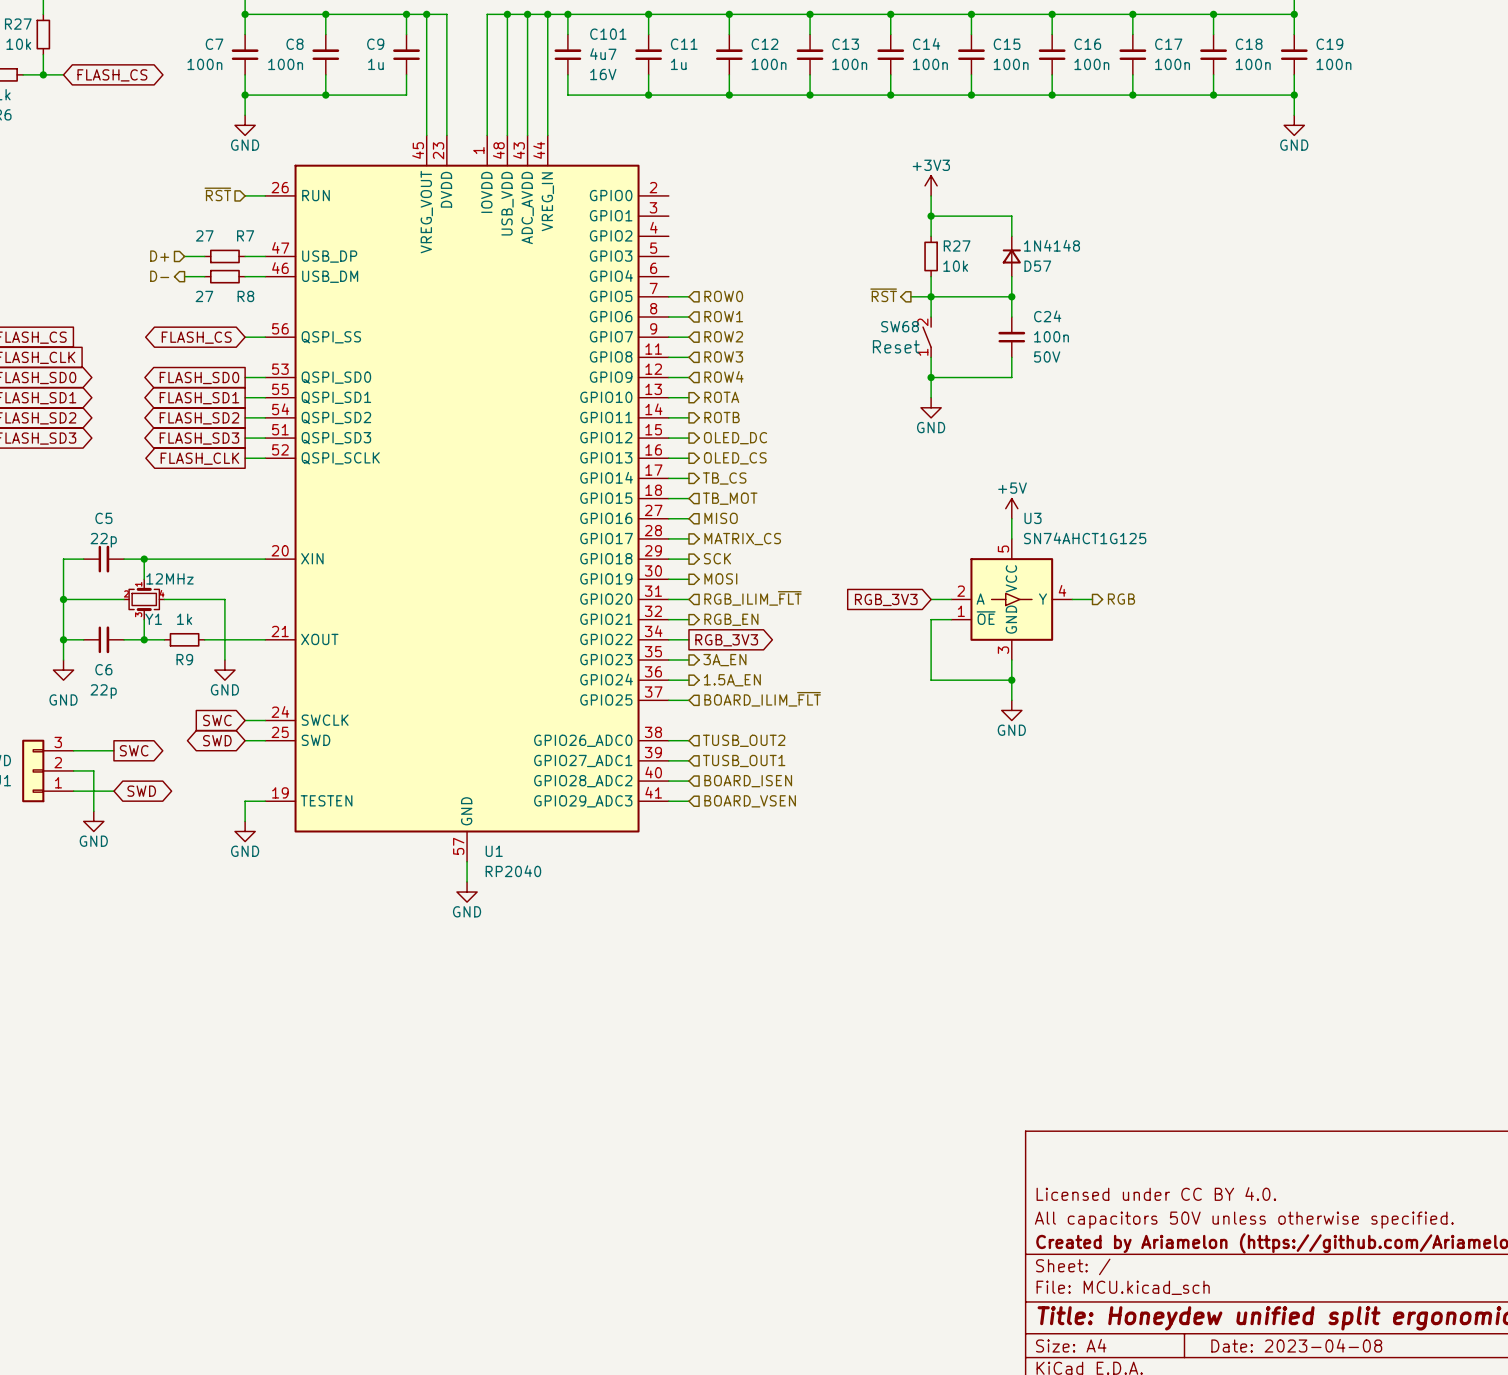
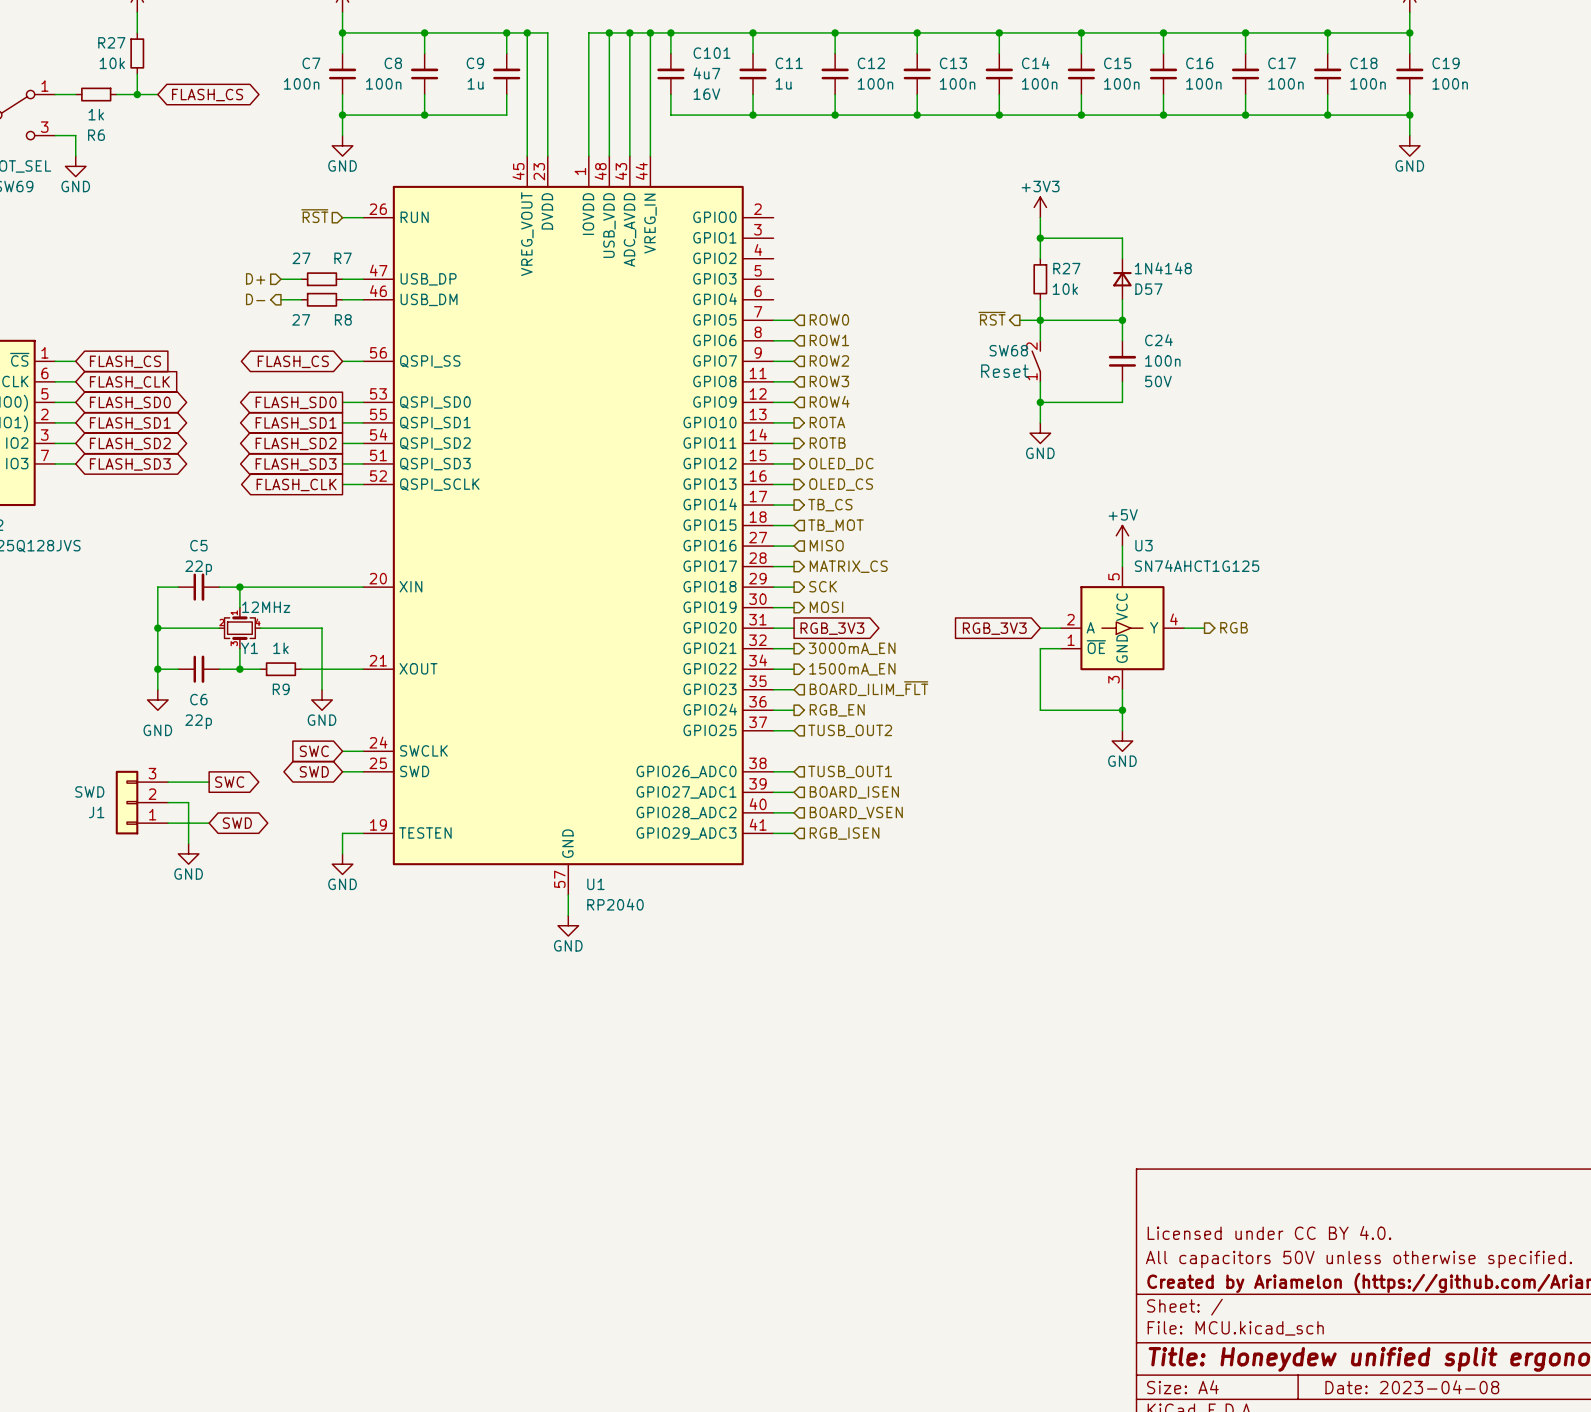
hierarchical label: RGB_ILIM_~{FLT} (753, 598) -> none
hierarchical label: RGB_EN (731, 619) -> 3000mA_EN (852, 648)
hierarchical label: none -> 1500mA_EN (852, 669)
global label position: RGB_3V3 (726, 640) -> RGB_3V3 (832, 628)
hierarchical label shape: output (724, 660) -> input (868, 688)
hierarchical label: 3A_EN (724, 660) -> BOARD_ILIM_~{FLT} (868, 688)
hierarchical label: 1.5A_EN (732, 680) -> RGB_EN (837, 710)
hierarchical label: BOARD_ILIM_~{FLT} (762, 699) -> TUSB_OUT2 (850, 730)
hierarchical label: TUSB_OUT2 (744, 740) -> TUSB_OUT1 (850, 771)
hierarchical label: TUSB_OUT1 (744, 760) -> BOARD_ISEN (854, 792)
hierarchical label: BOARD_ISEN (748, 781) -> BOARD_VSEN (856, 812)
hierarchical label: BOARD_VSEN (750, 801) -> RGB_ISEN (844, 833)

